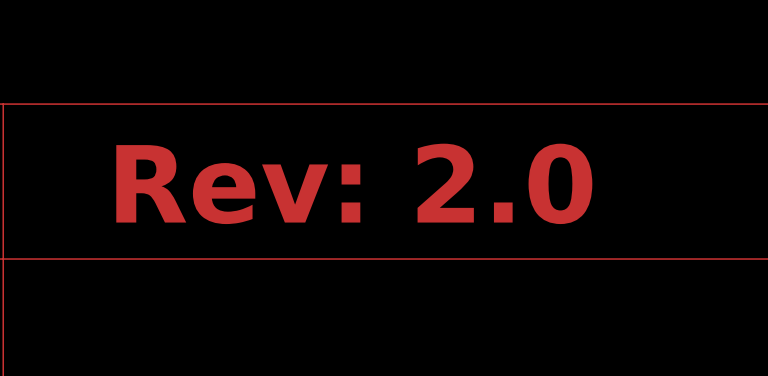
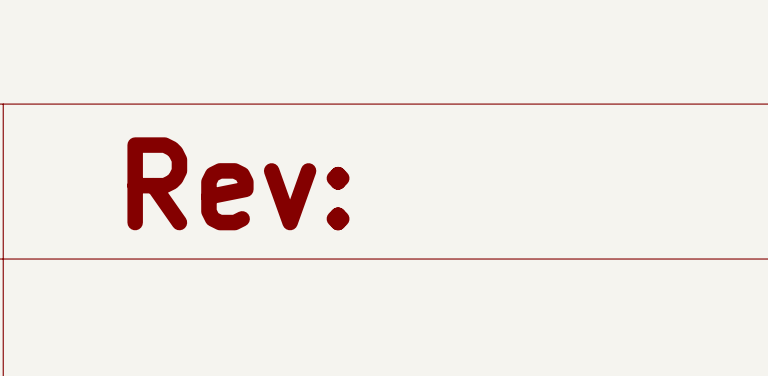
title block: Rev: 2.0 (354, 183) -> Rev: (238, 183)

